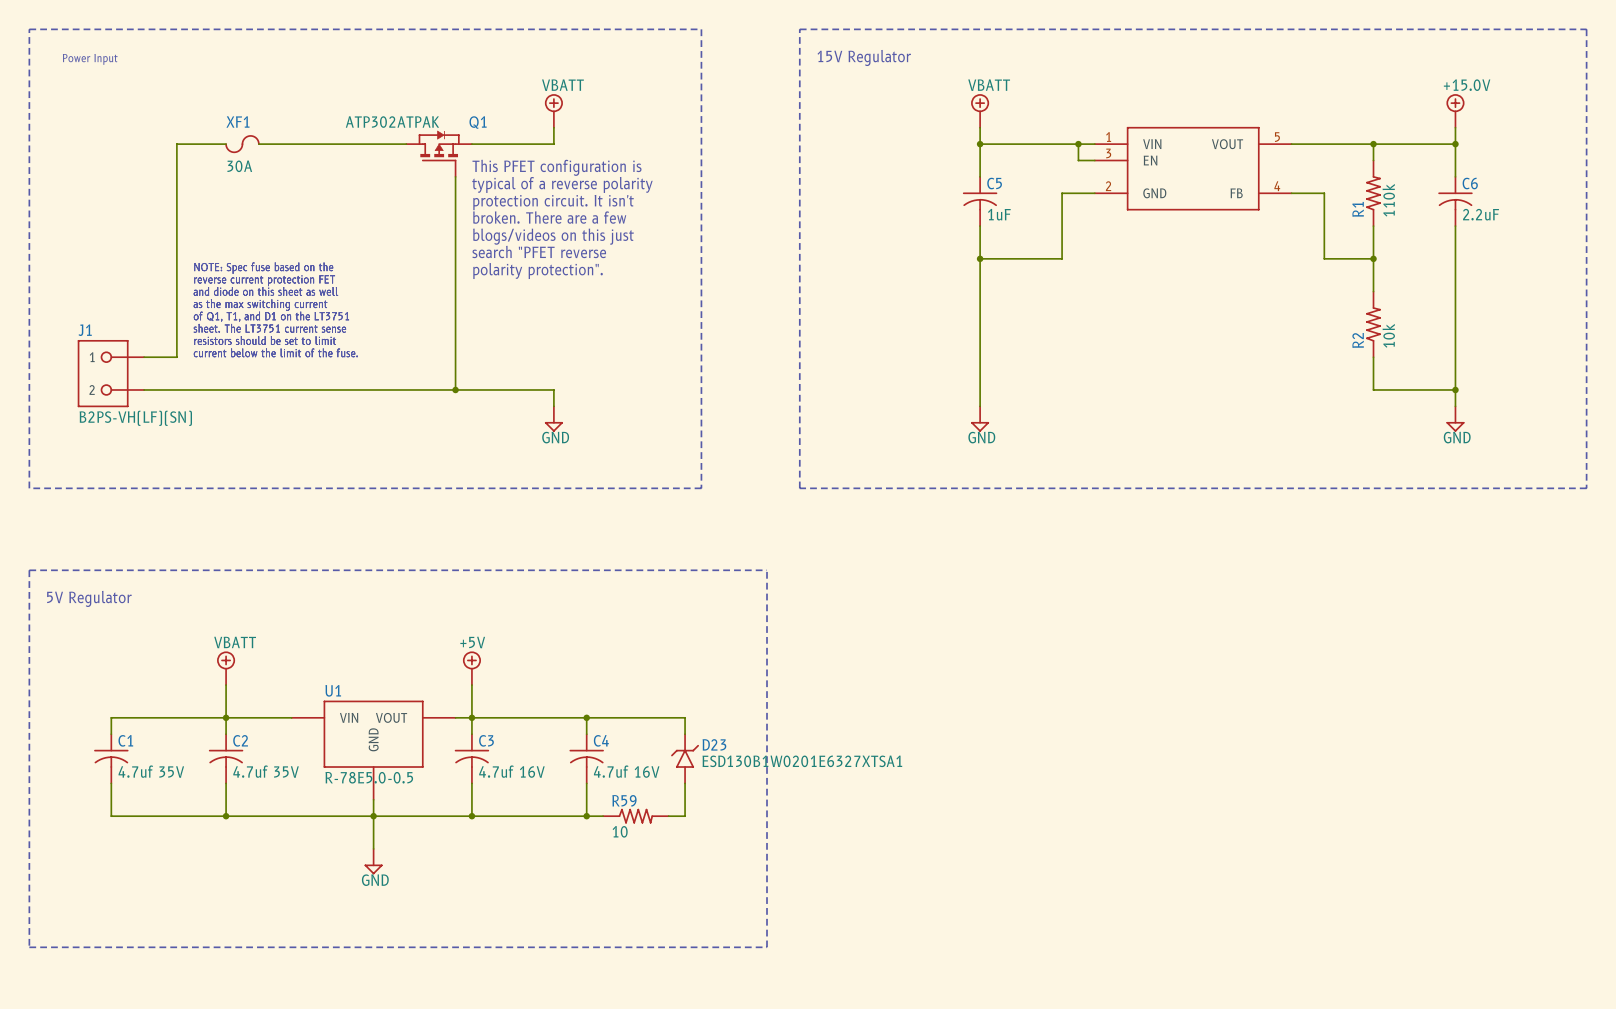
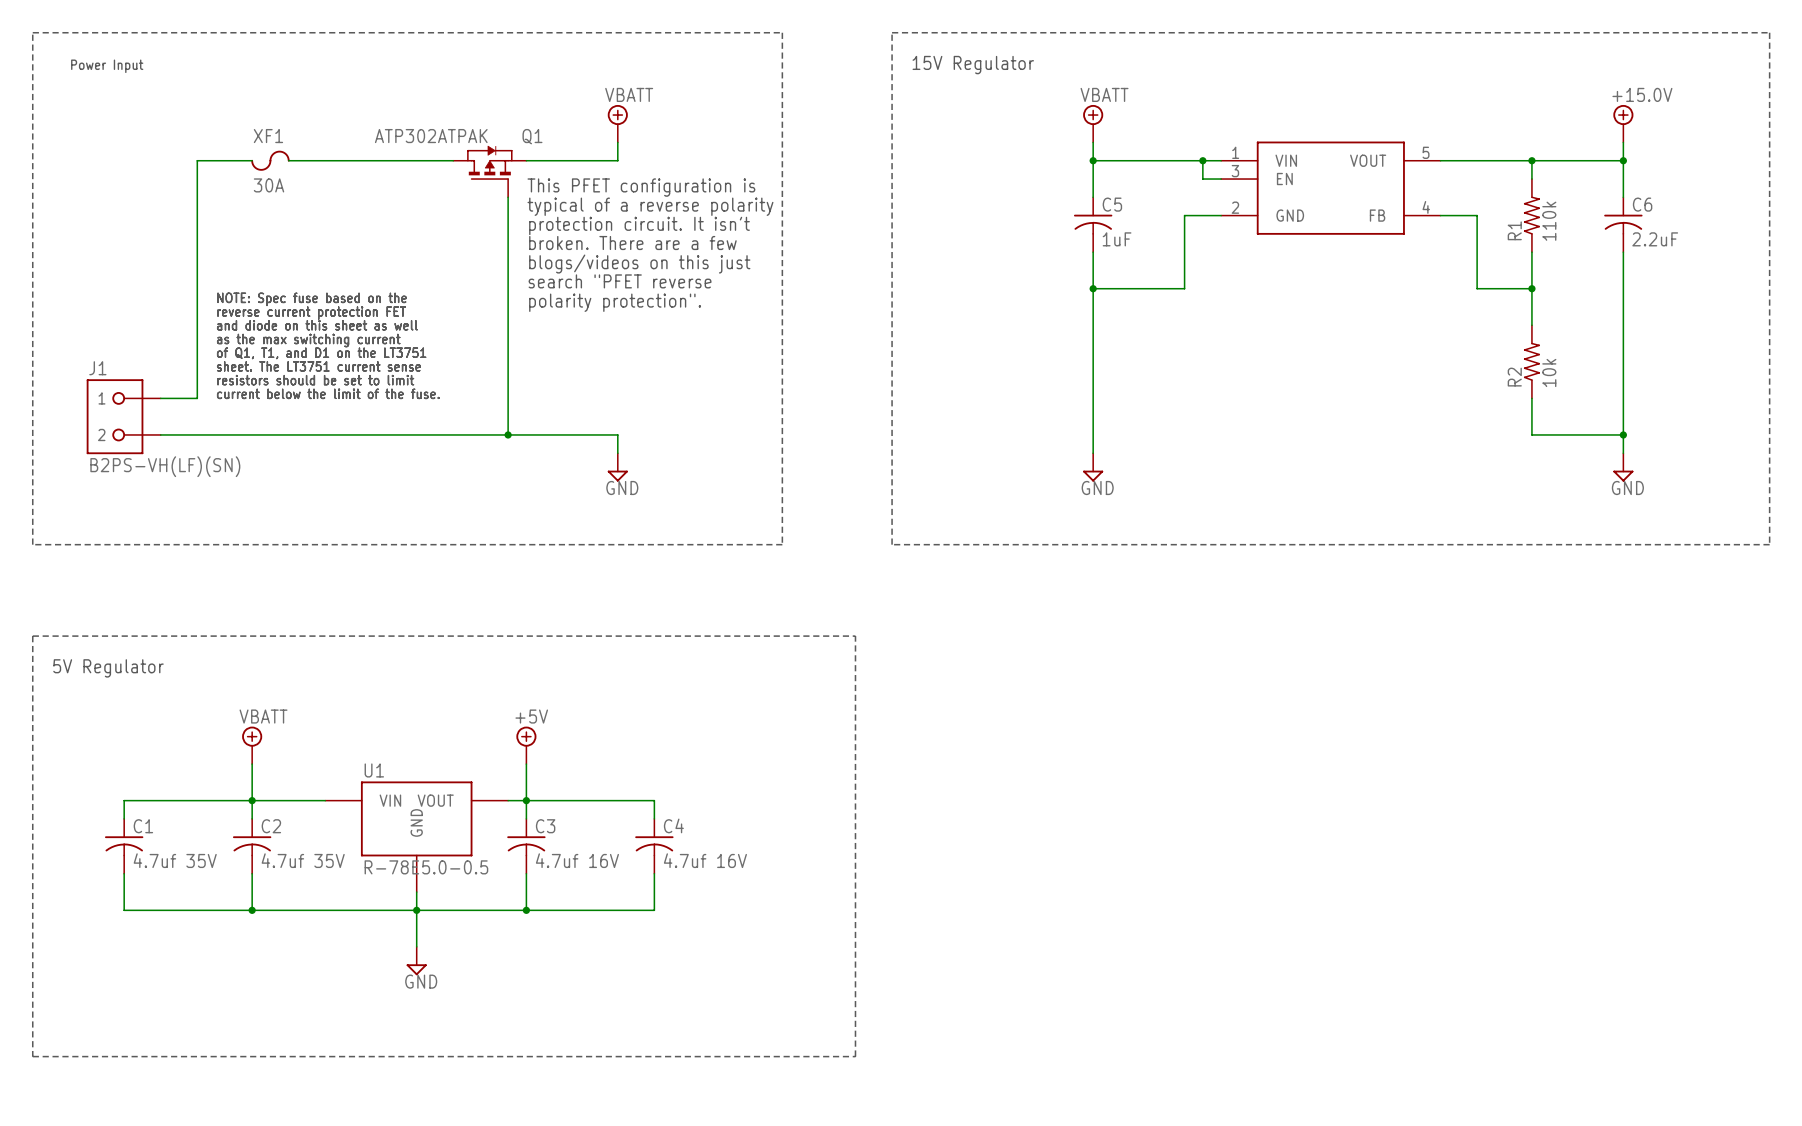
wire: (586, 717) (685, 717) (685, 734) -> none
junction: (586, 717) -> none
D23: ESD130B1W0201E6327XTSA1 (685, 758) -> none
wire: (685, 783) (685, 816) (668, 816) -> none
wire: (586, 816) (603, 816) -> none
junction: (586, 816) -> none
R59: 10 (635, 816) -> none

